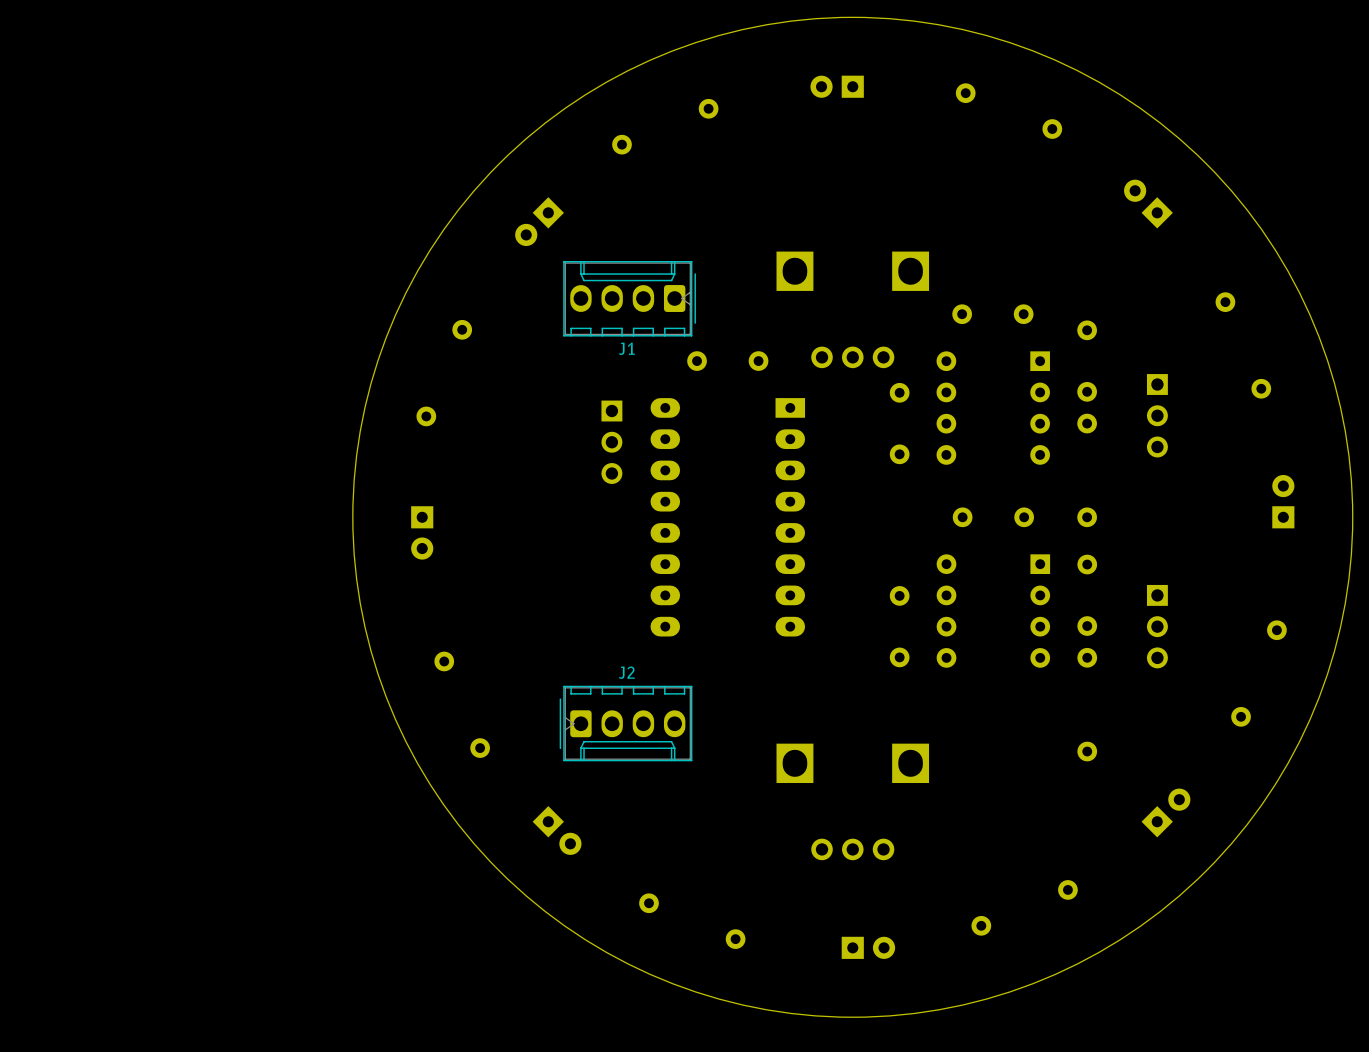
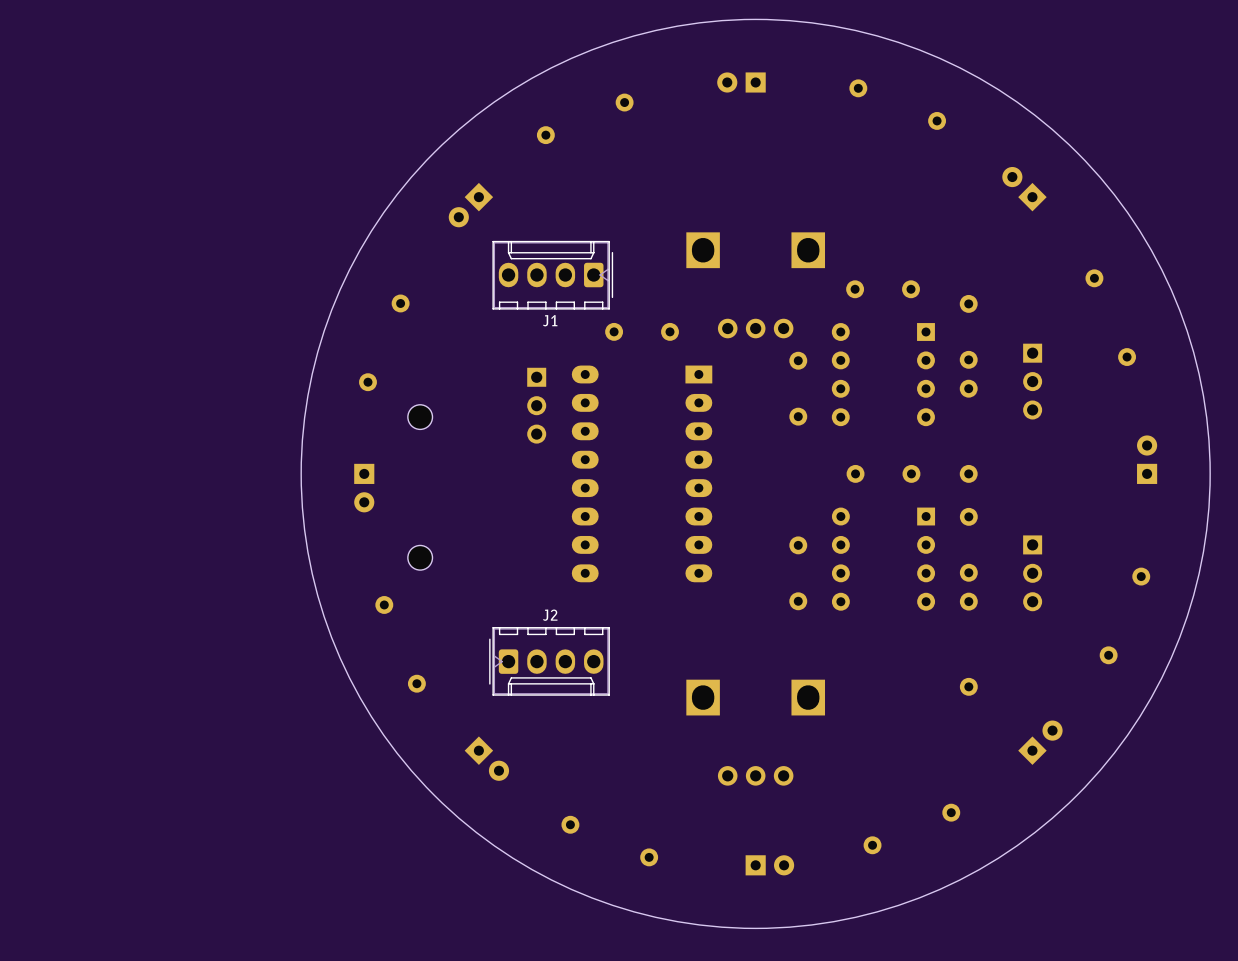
part: none -> (420, 417)
part: none -> (420, 557)

